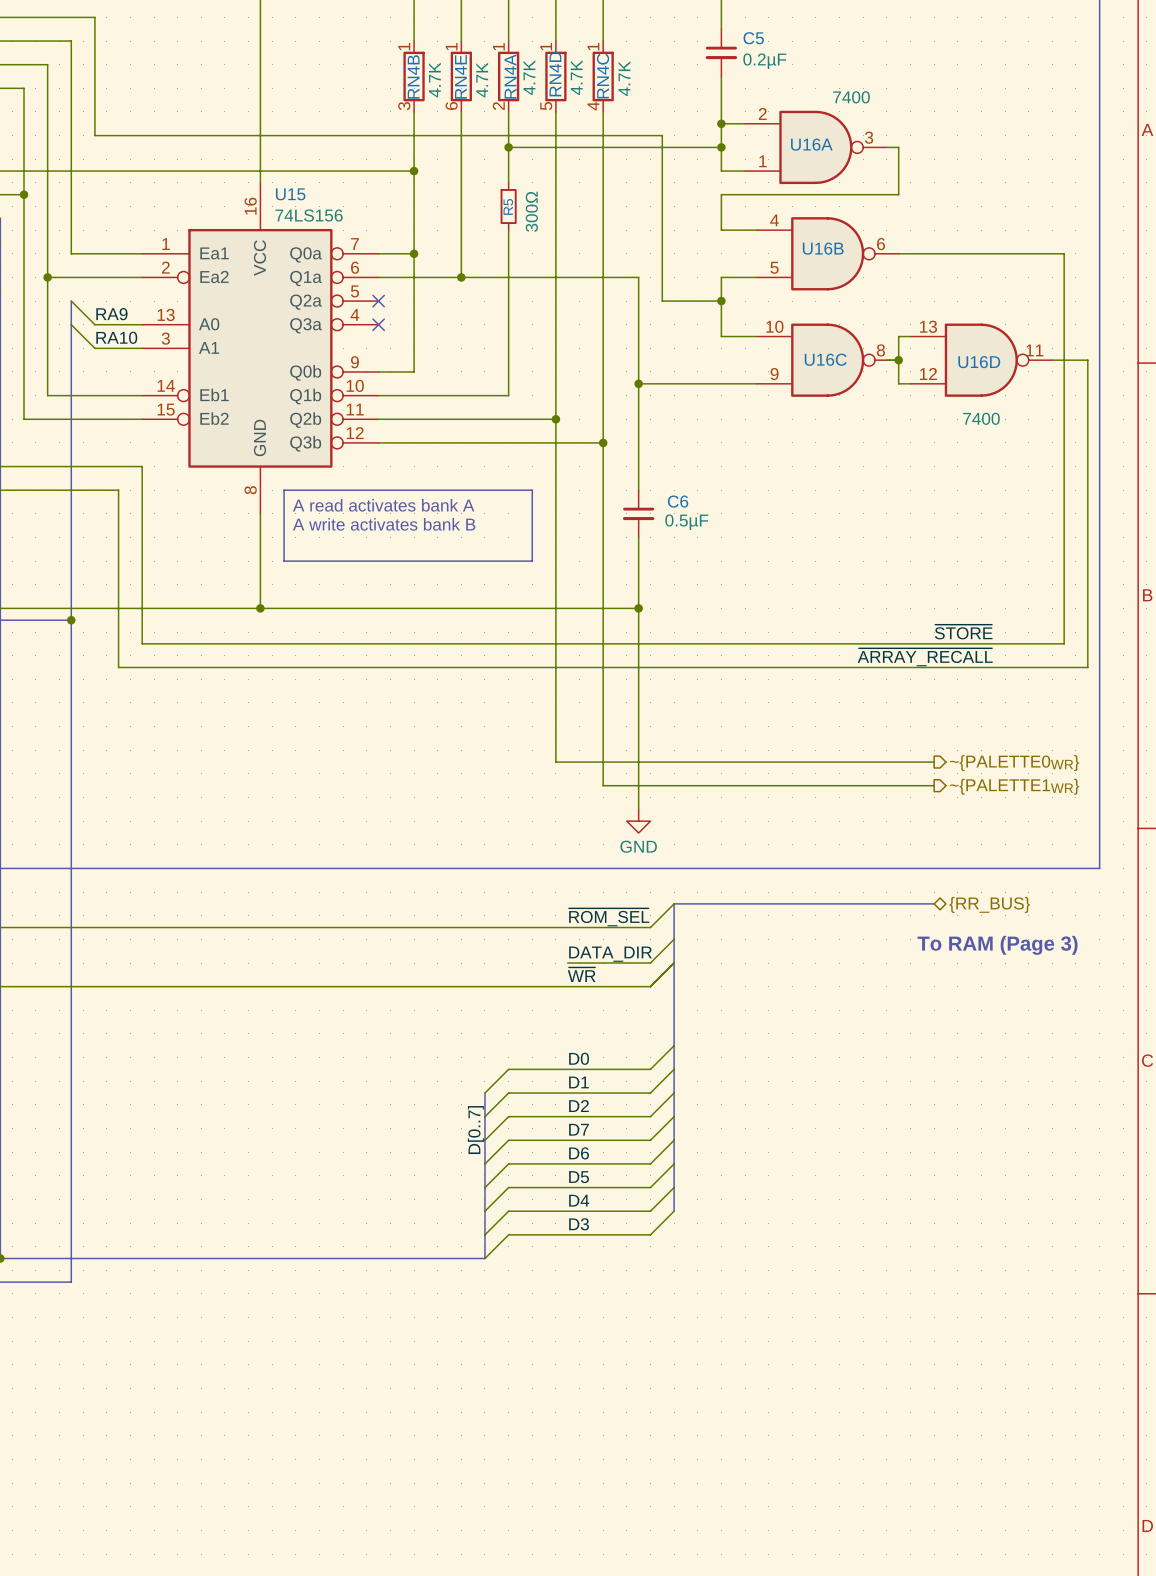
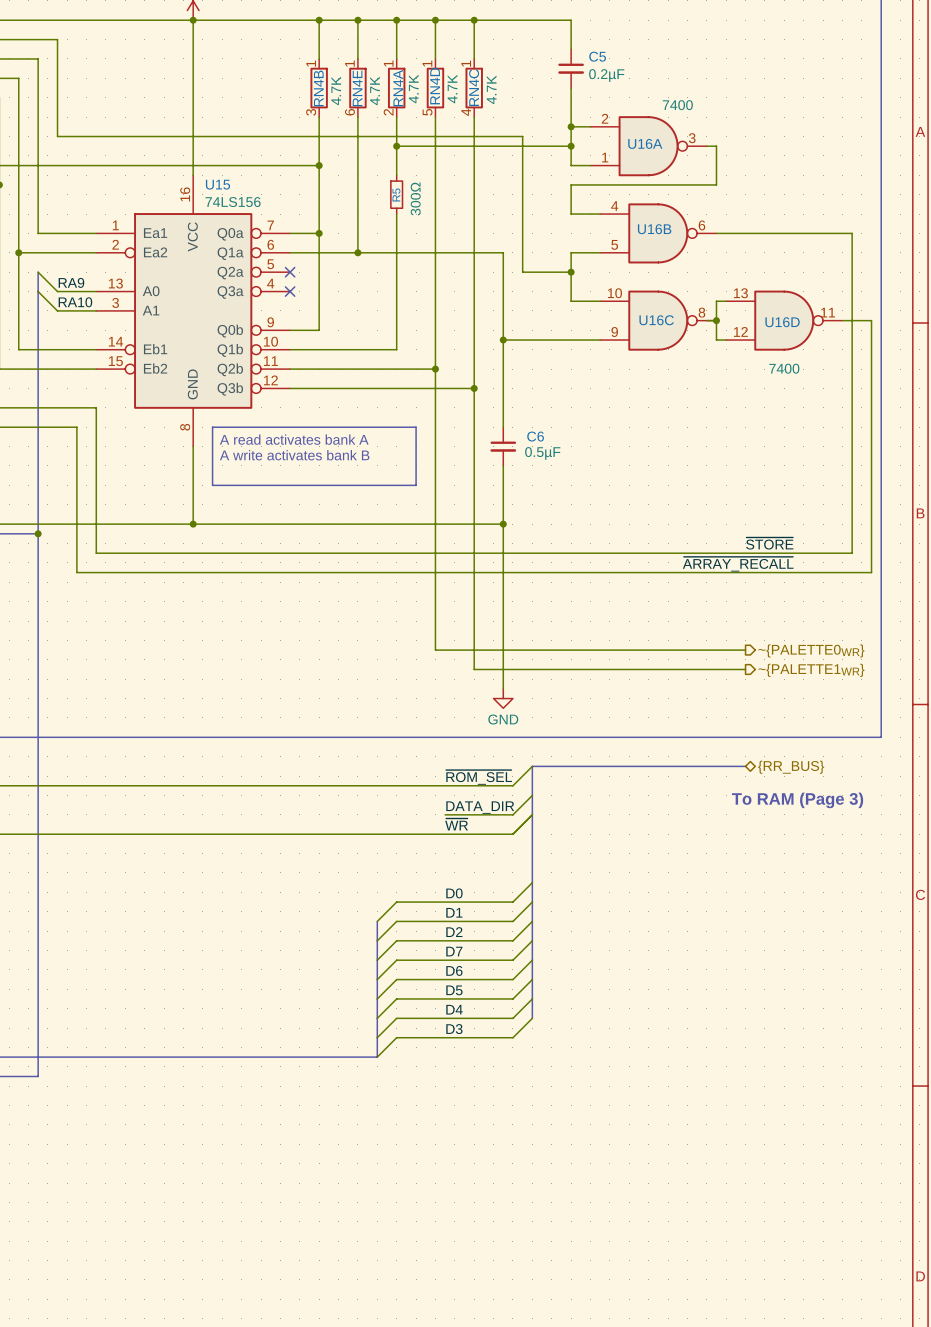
label: D[0..7] (475, 1130) -> none

